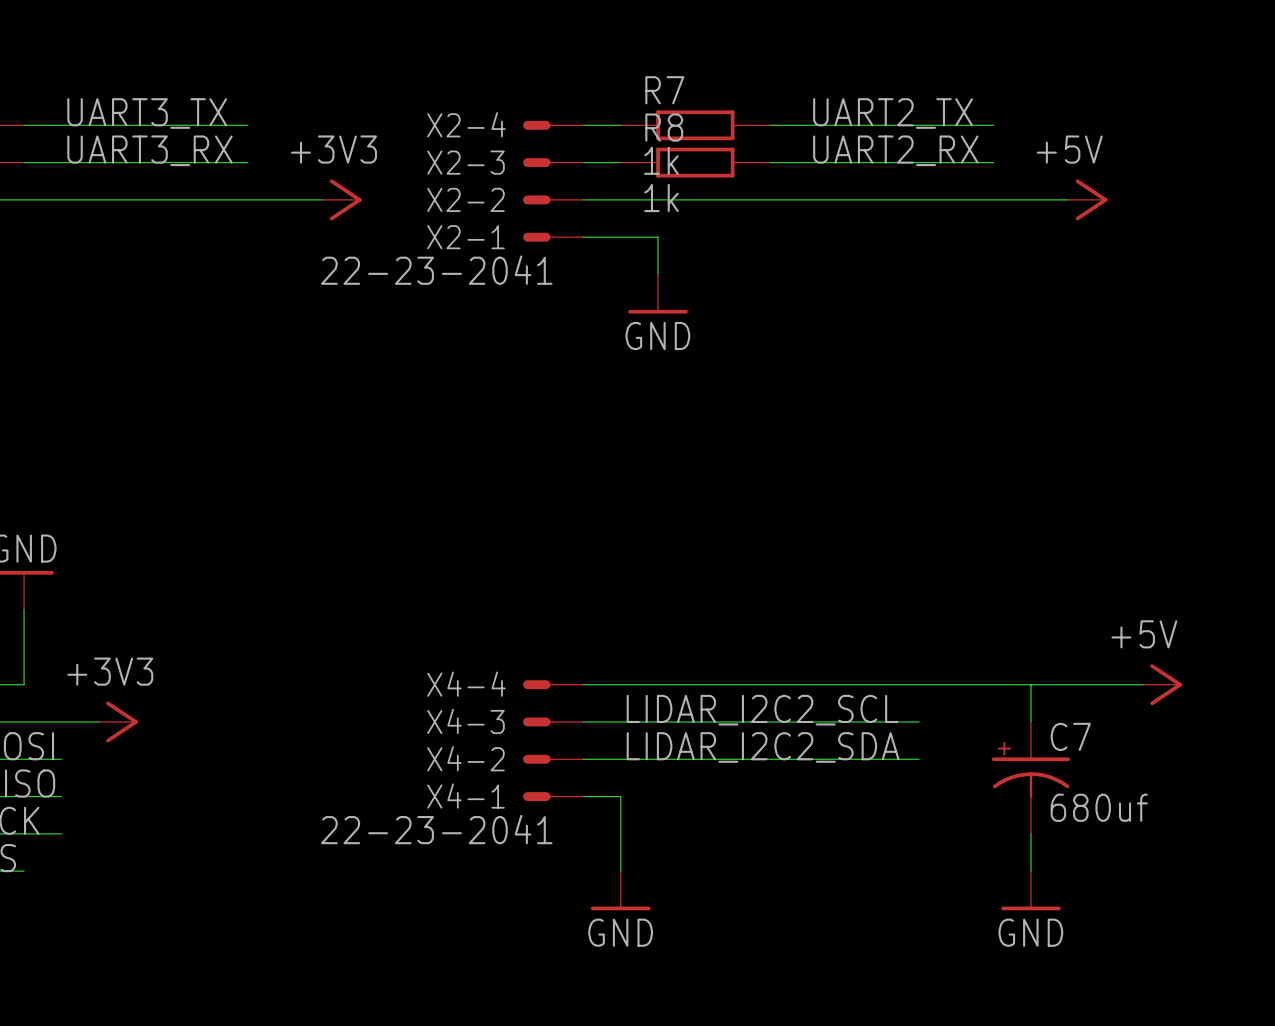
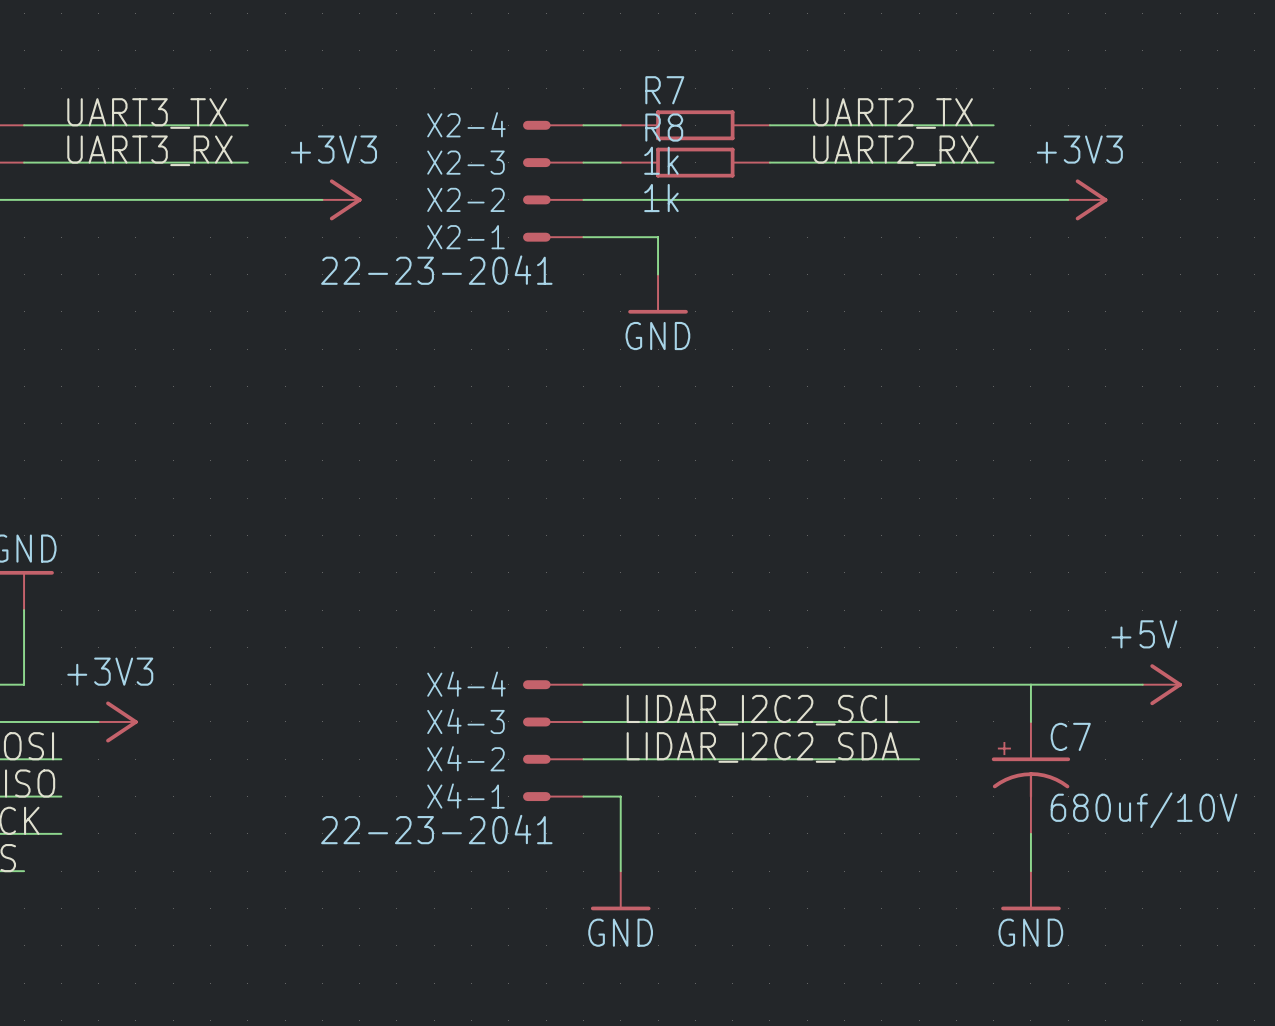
power symbol: +5V (1087, 199) -> +3V3 (1087, 199)
C7 value: 680uf (1099, 807) -> 680uf/10V (1144, 810)

